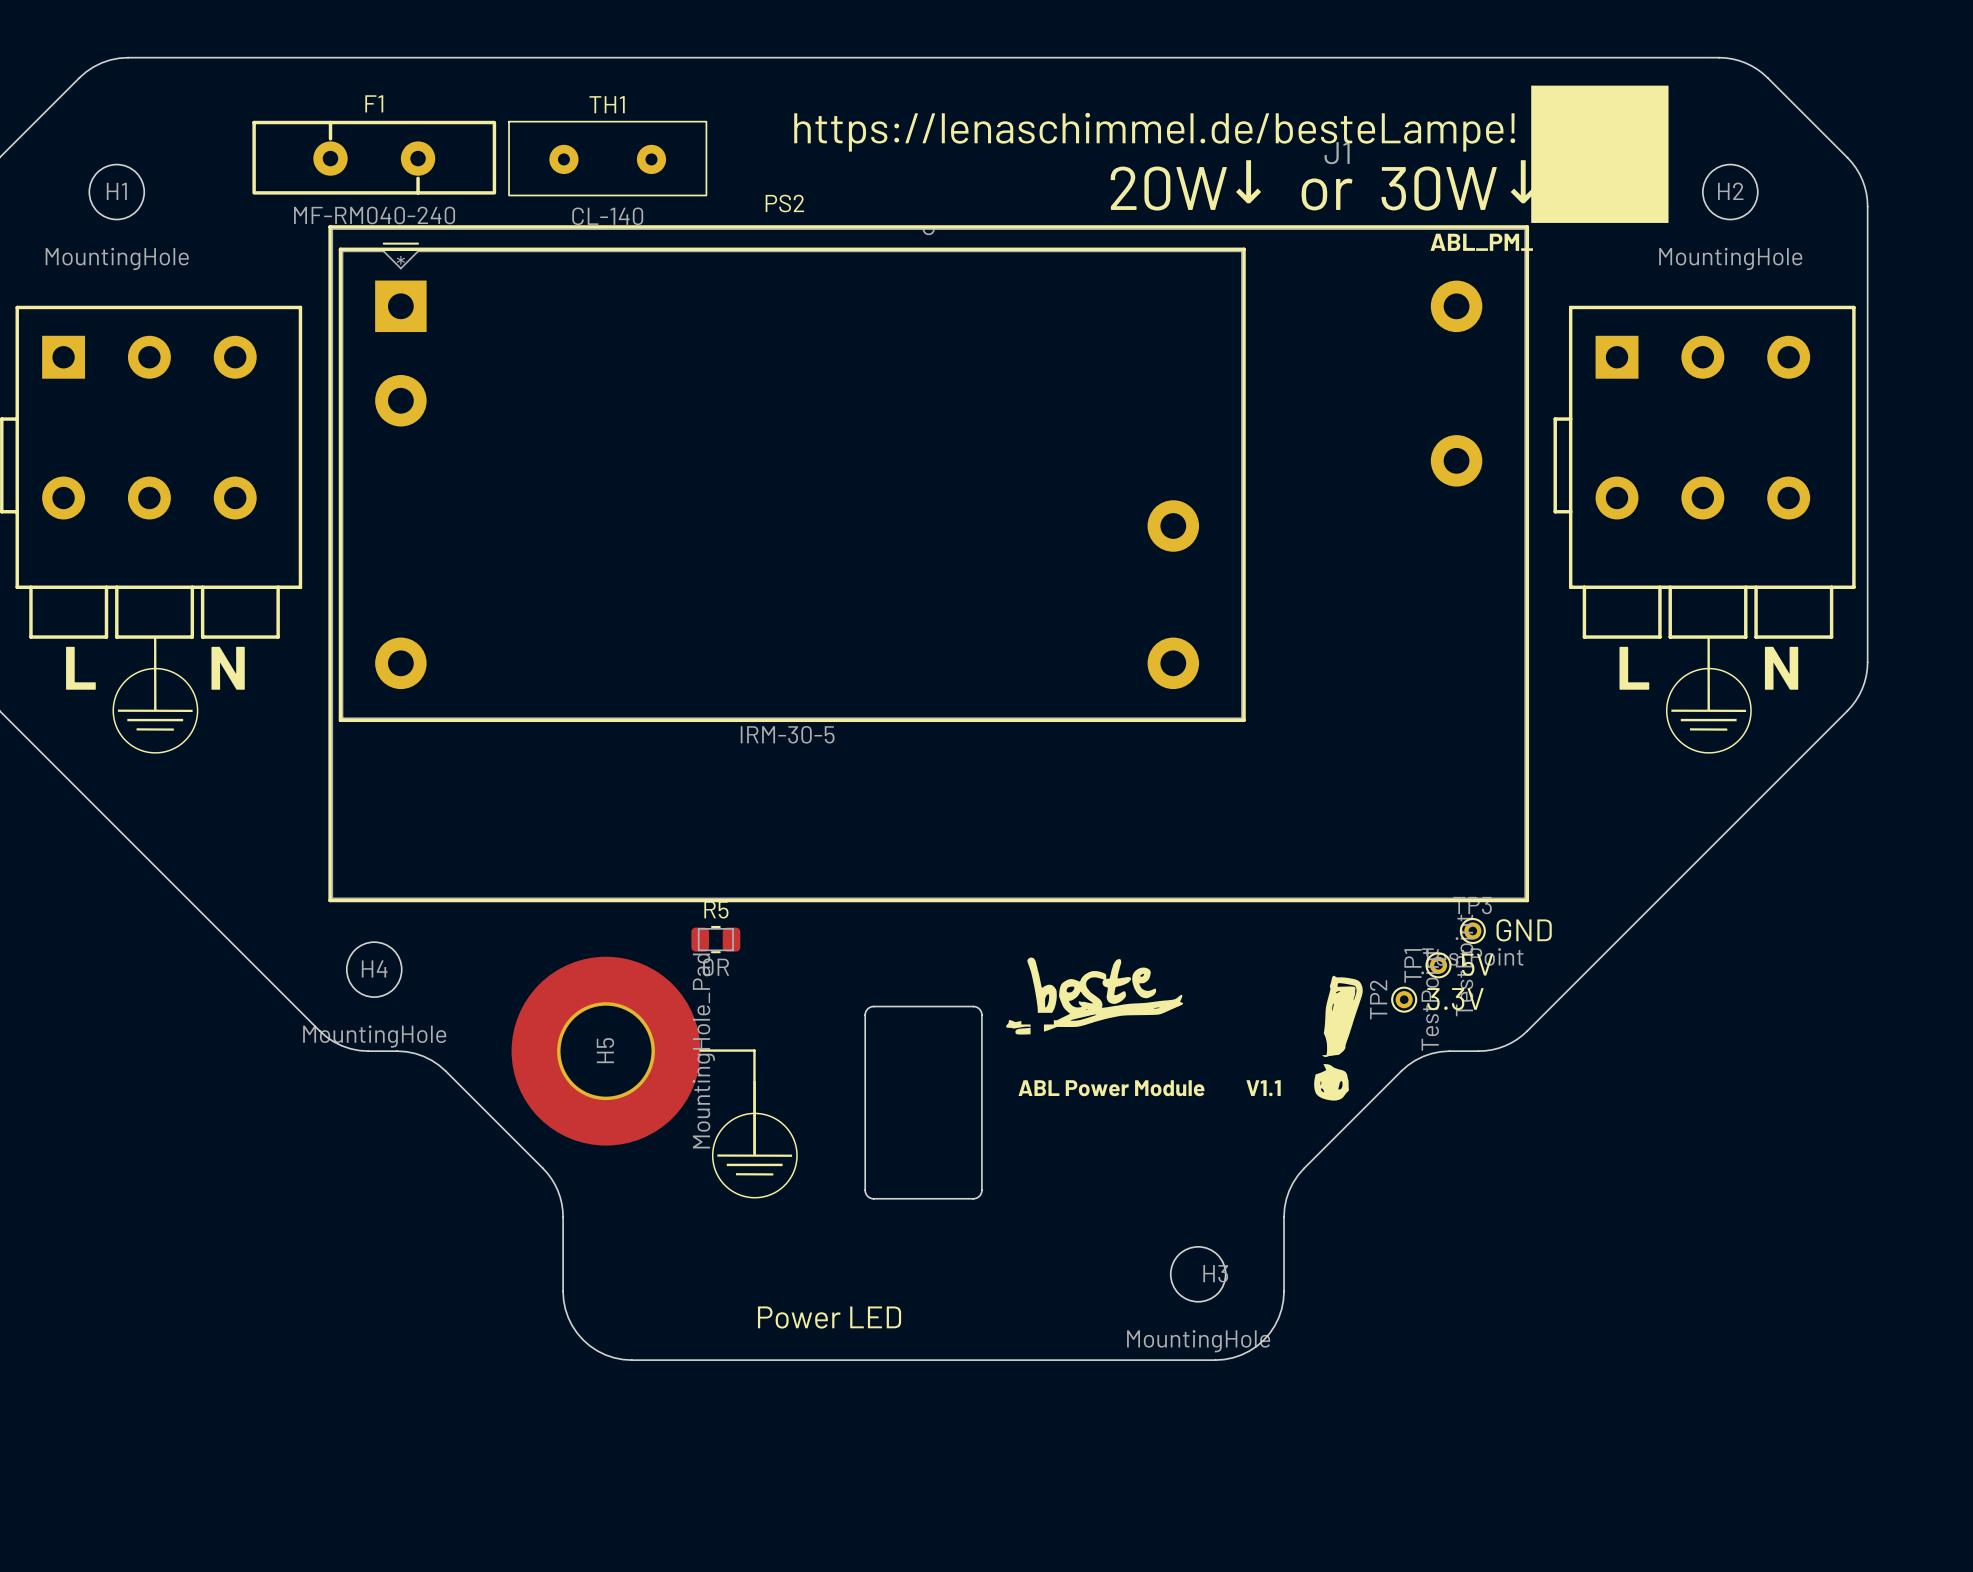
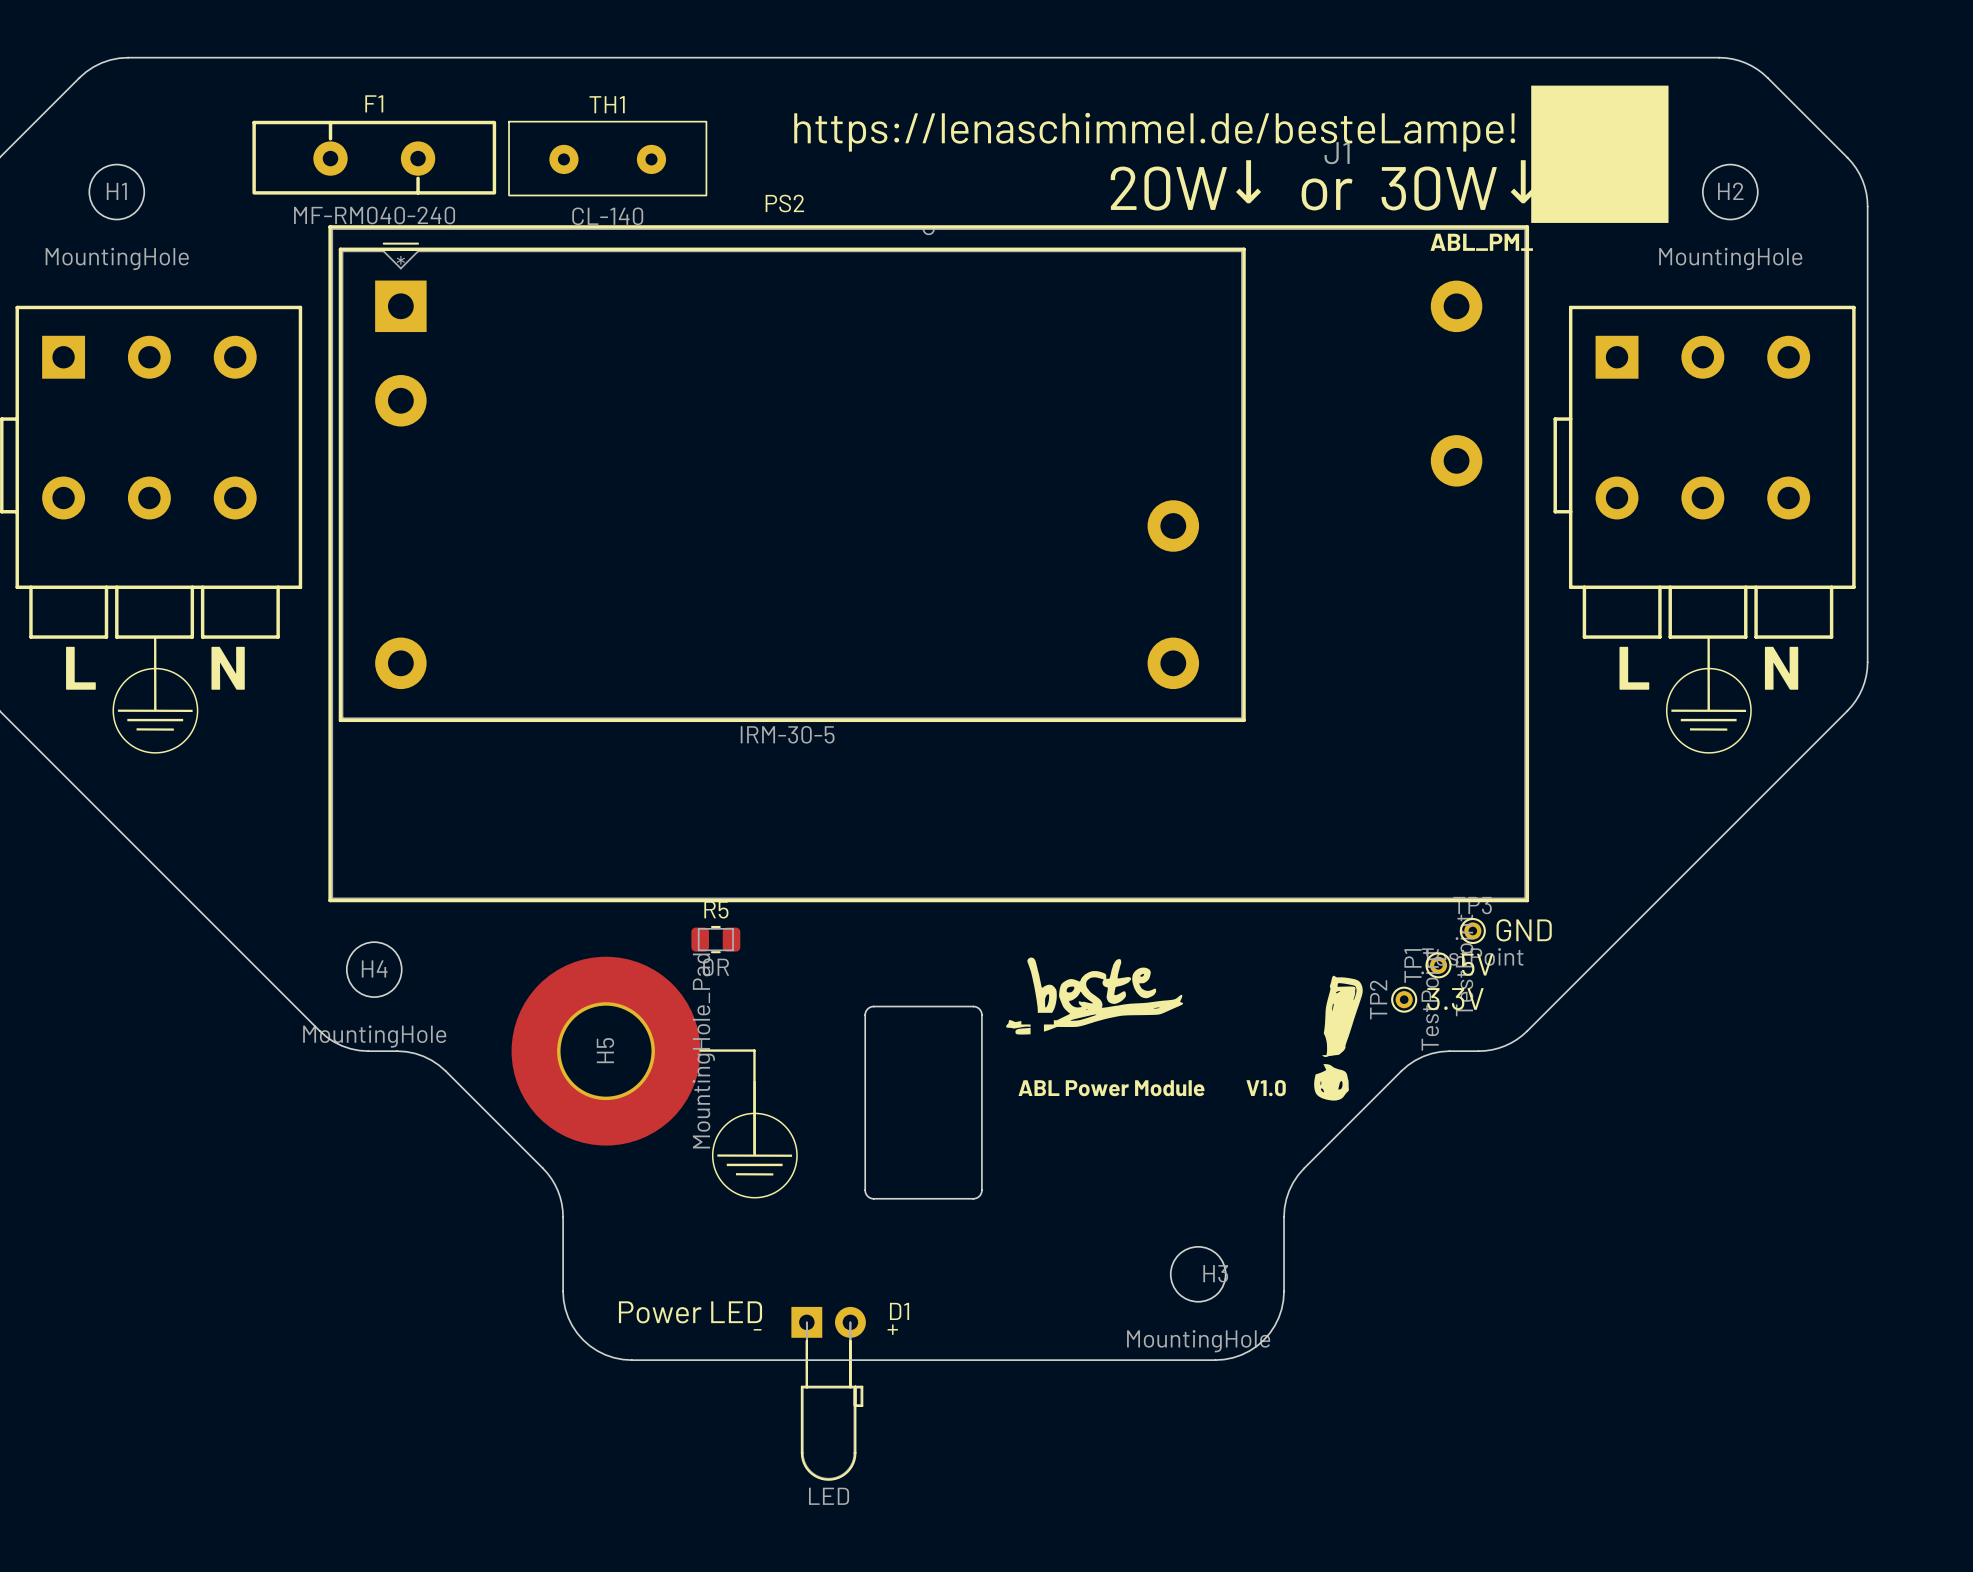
text: ABL Power Module V1.1 (1149, 1088) -> ABL Power Module V1.0 (1152, 1088)
text position: Power LED (829, 1317) -> Power LED (690, 1312)
text: none -> - (757, 1329)
text: none -> + (892, 1329)
D1: none -> LED (828, 1393)

